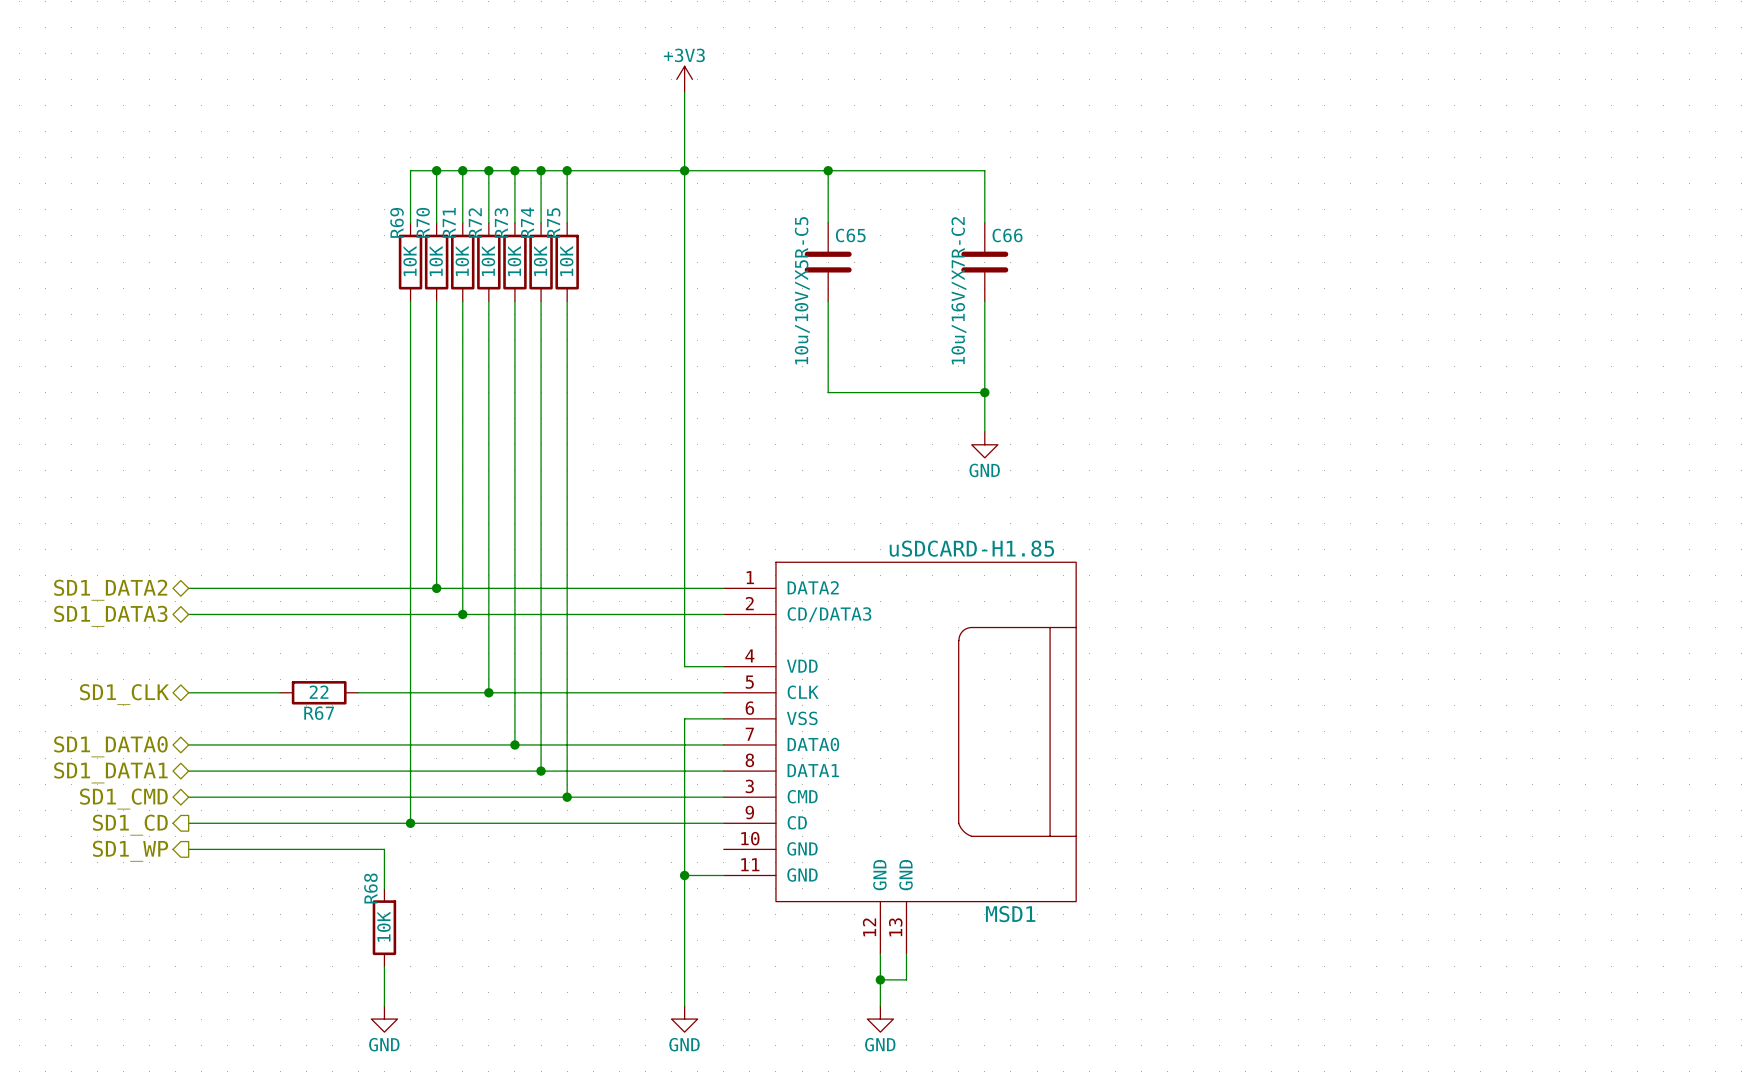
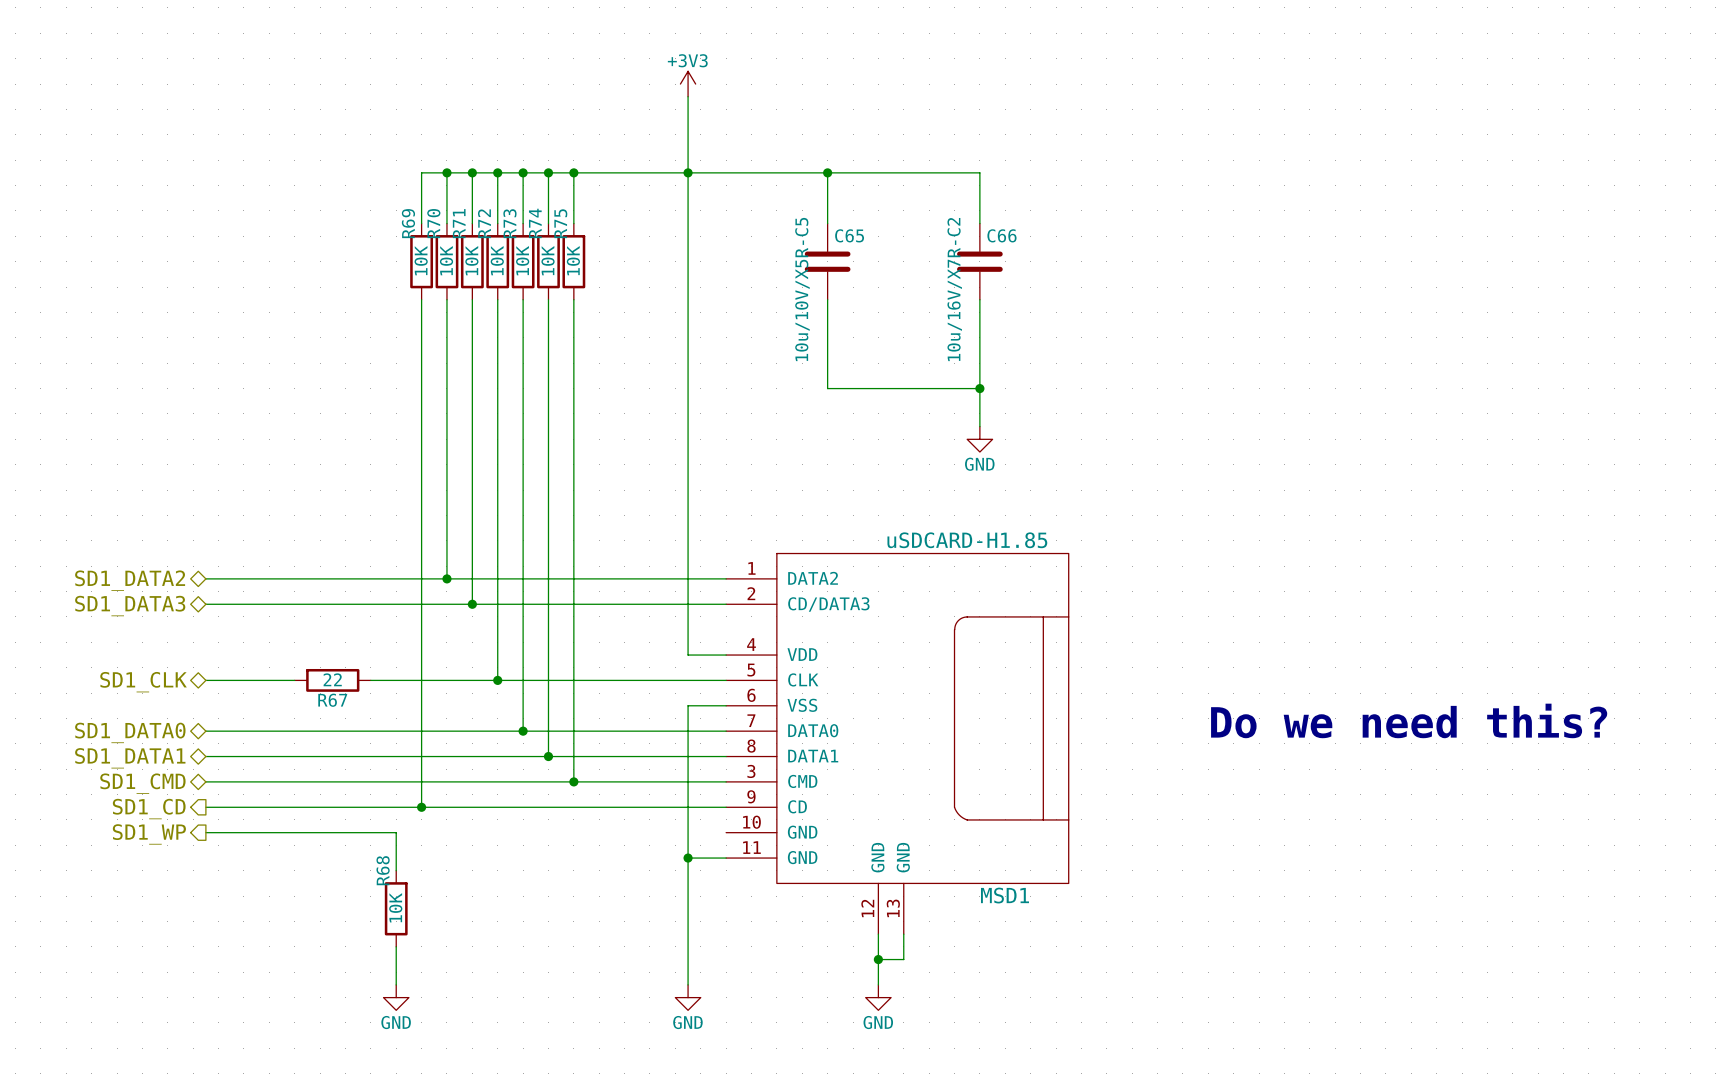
text: none -> Do we need this? (1409, 720)

